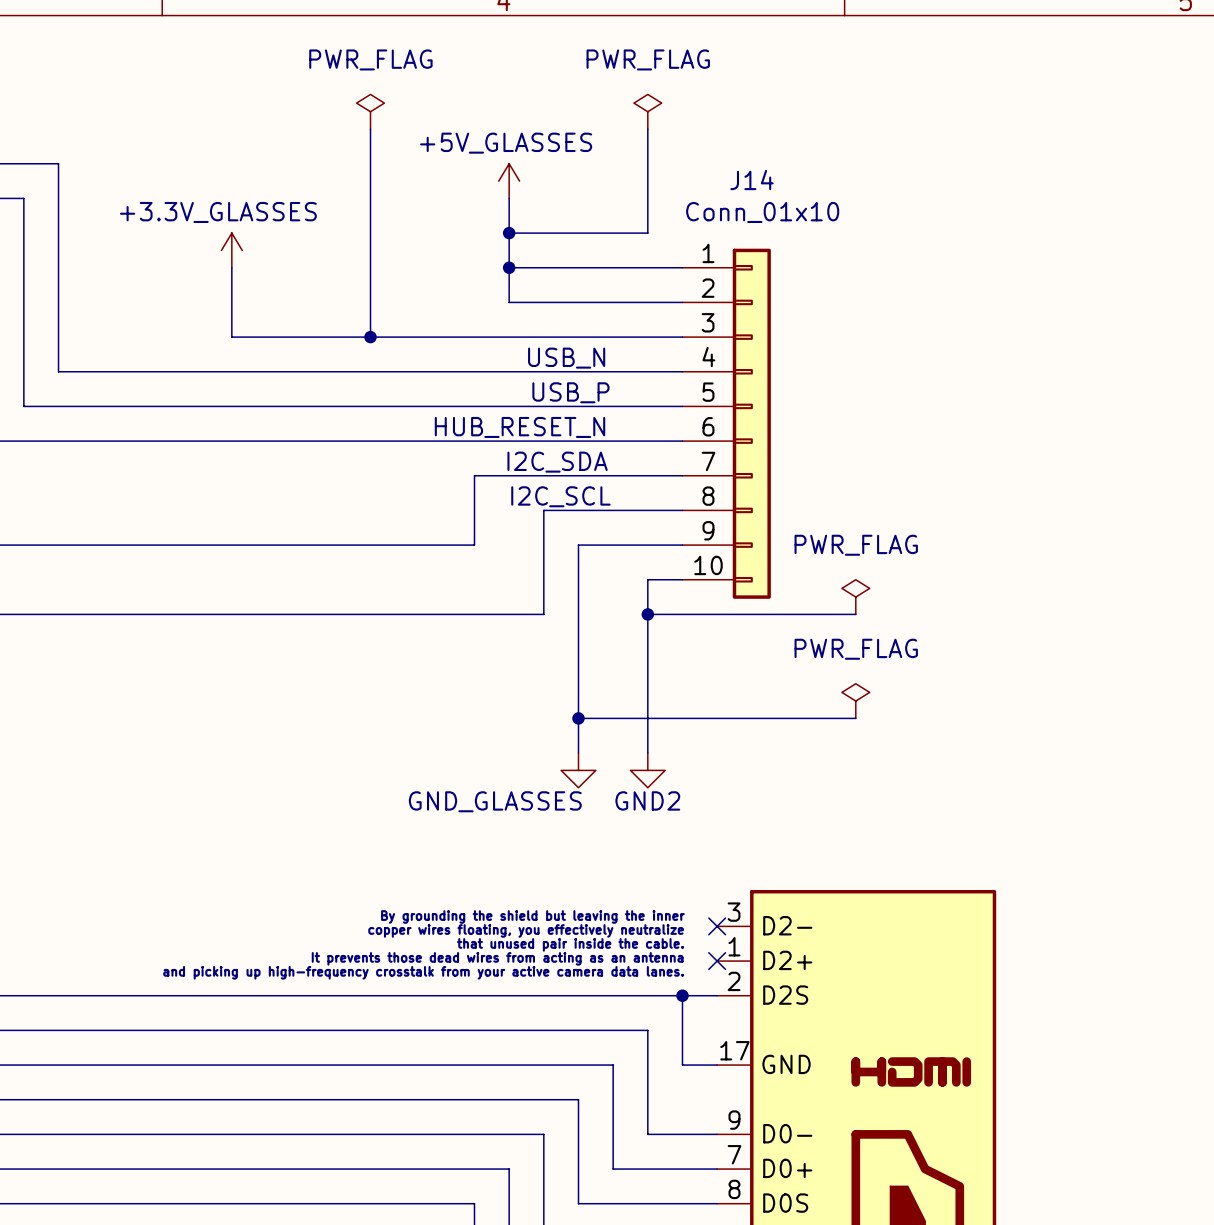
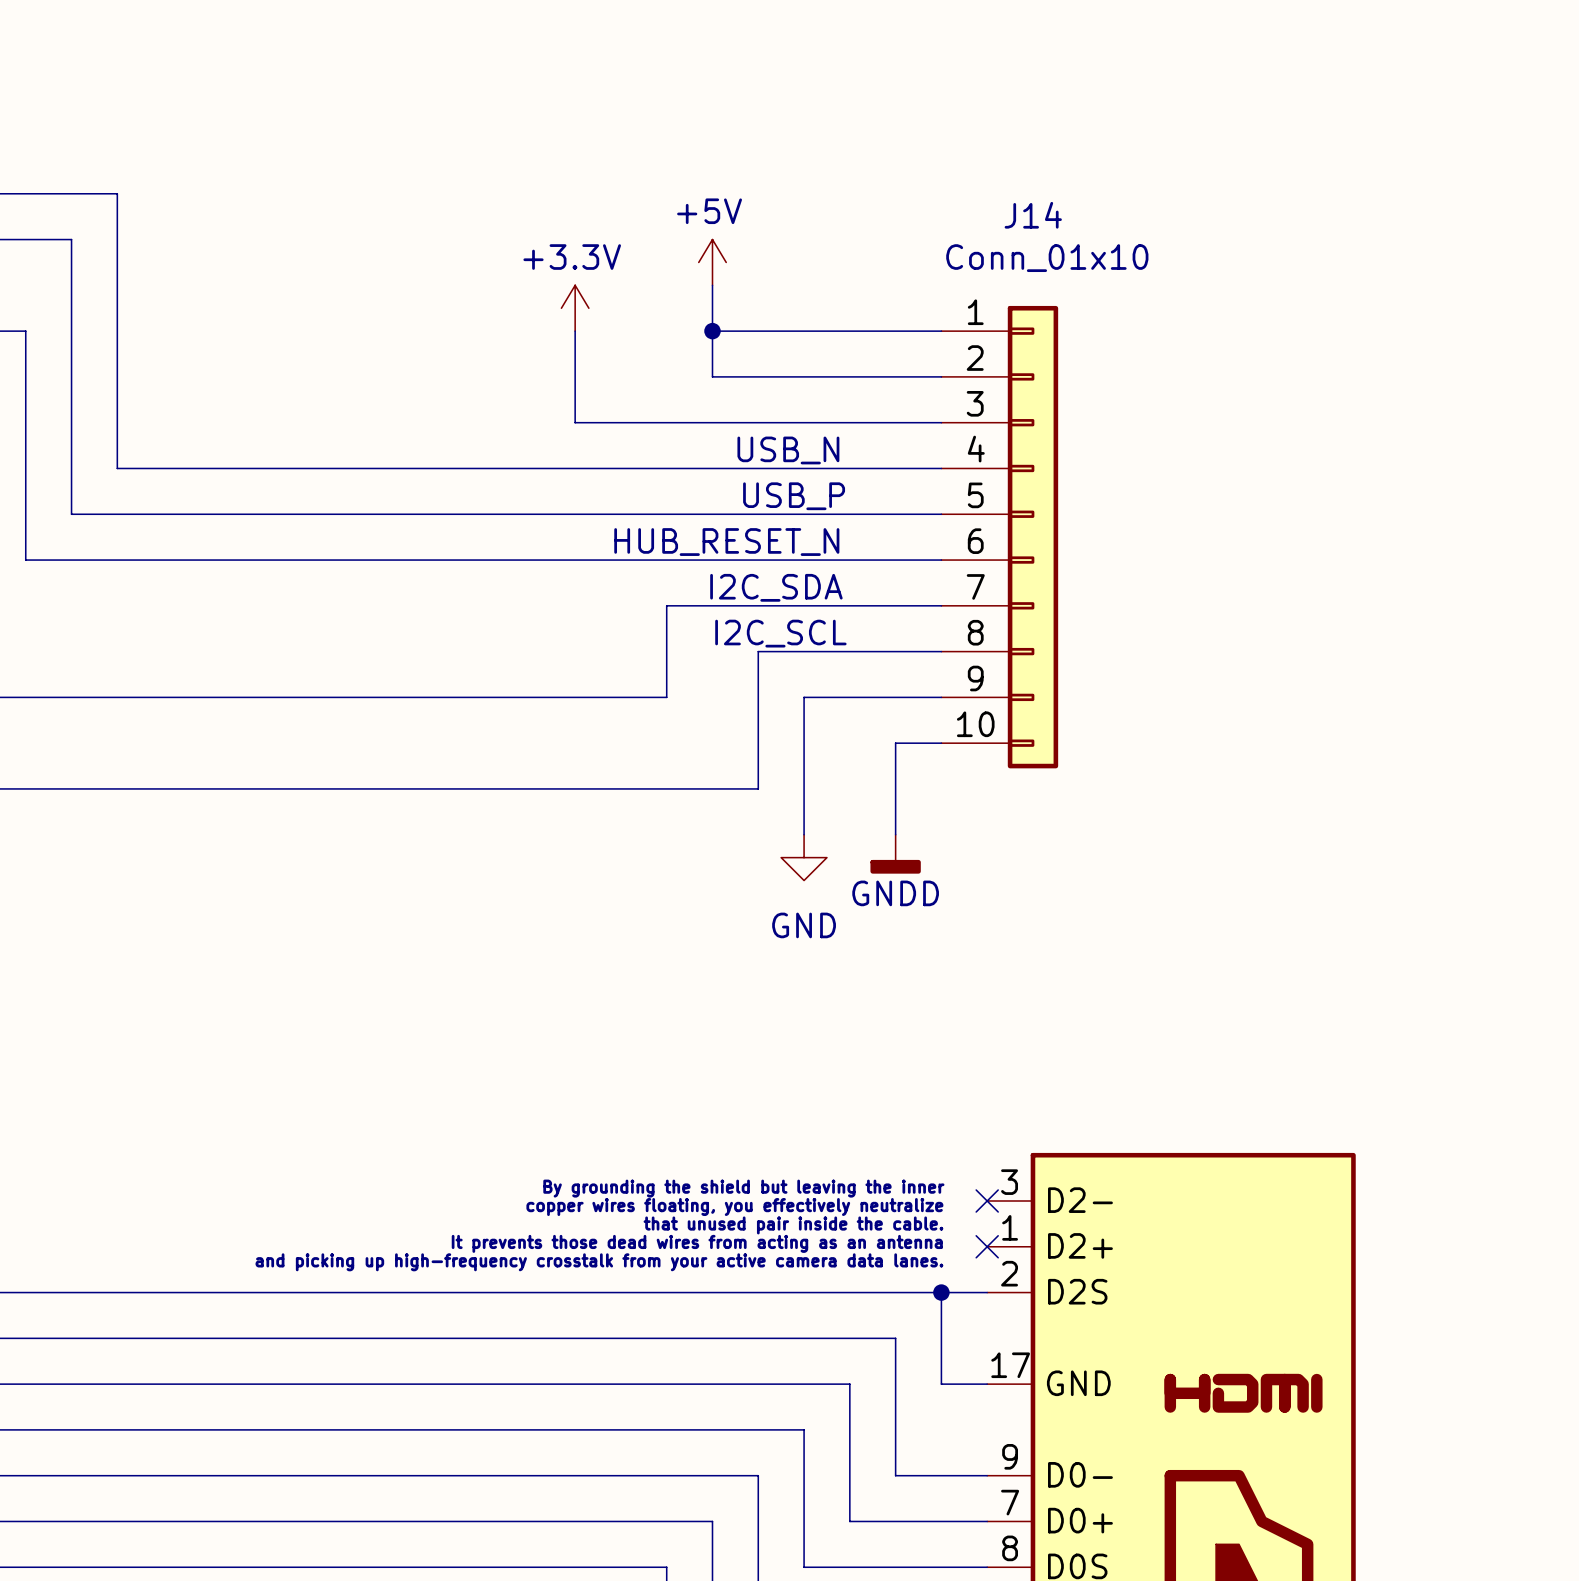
power symbol: PWR_FLAG (370, 111) -> none
power symbol: PWR_FLAG (647, 111) -> none
wire: (370, 129) (370, 337) -> none
wire: (647, 129) (647, 233) (509, 233) (509, 198) -> none
power symbol: +5V_GLASSES (509, 181) -> none
power symbol: none -> +5V (712, 262)
junction: (509, 233) -> none
power symbol: +3.3V_GLASSES (231, 250) -> none
power symbol: none -> +3.3V (575, 308)
wire: (231, 267) (231, 337) (405, 337) -> (575, 331) (575, 422)
junction: (370, 337) -> none
power symbol: PWR_FLAG (855, 597) -> none
wire: (647, 614) (855, 614) -> none
junction: (647, 614) -> none
wire: (578, 649) (578, 753) -> none
wire: (647, 649) (647, 753) -> none
power symbol: none -> GNDD (895, 854)
power symbol: none -> GND (804, 857)
power symbol: PWR_FLAG (855, 701) -> none
wire: (578, 718) (855, 718) -> none
junction: (578, 718) -> none
power symbol: GND_GLASSES (578, 770) -> none
power symbol: GND2 (647, 770) -> none

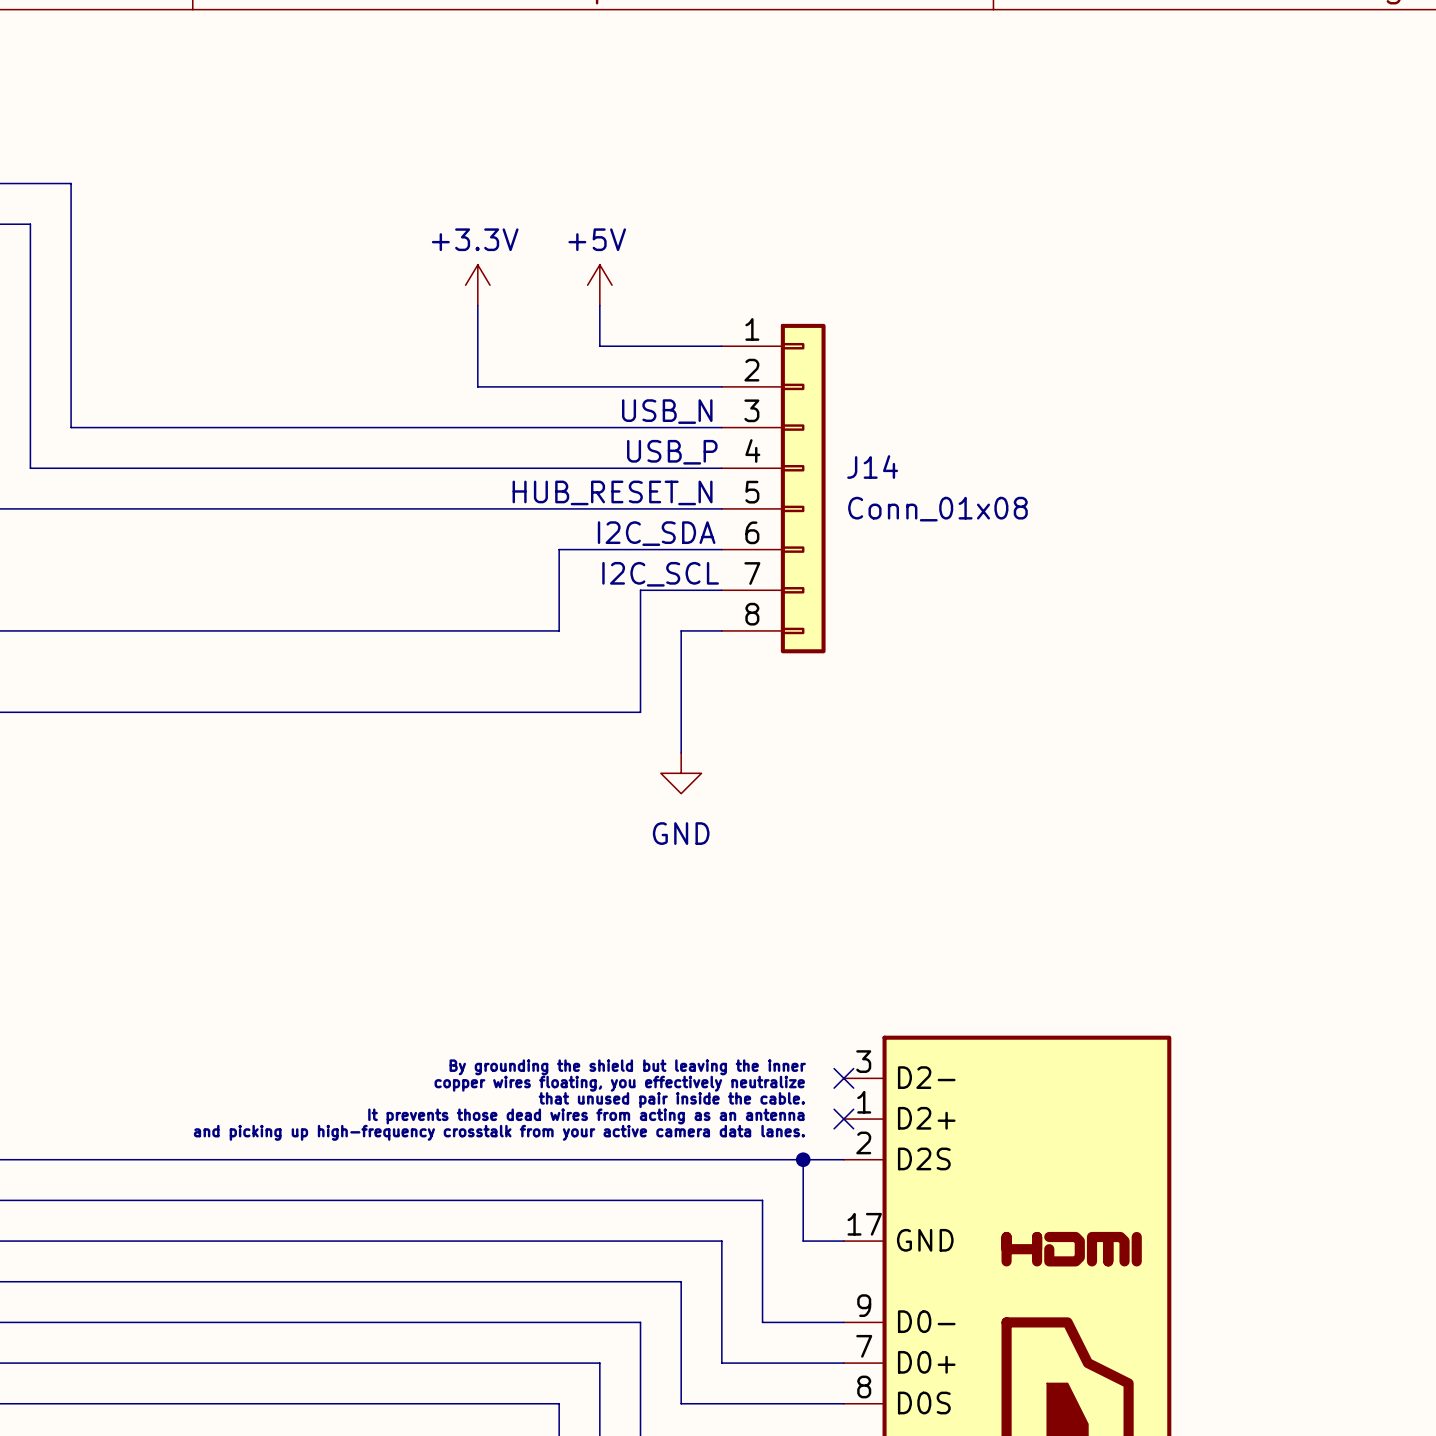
J14 name position: J14 (1033, 215) -> J14 (872, 467)
J14 value: Conn_01x10 (1047, 258) -> Conn_01x08 (937, 509)
power symbol position: +5V (712, 262) -> +5V (599, 285)
wire: (712, 285) (712, 331) (941, 331) -> none
J14 symbol: [941, 305, 1059, 769] -> [721, 323, 826, 654]
junction: (712, 331) -> none
wire: (941, 743) (895, 743) (895, 834) -> none
power symbol: GNDD (895, 854) -> none

